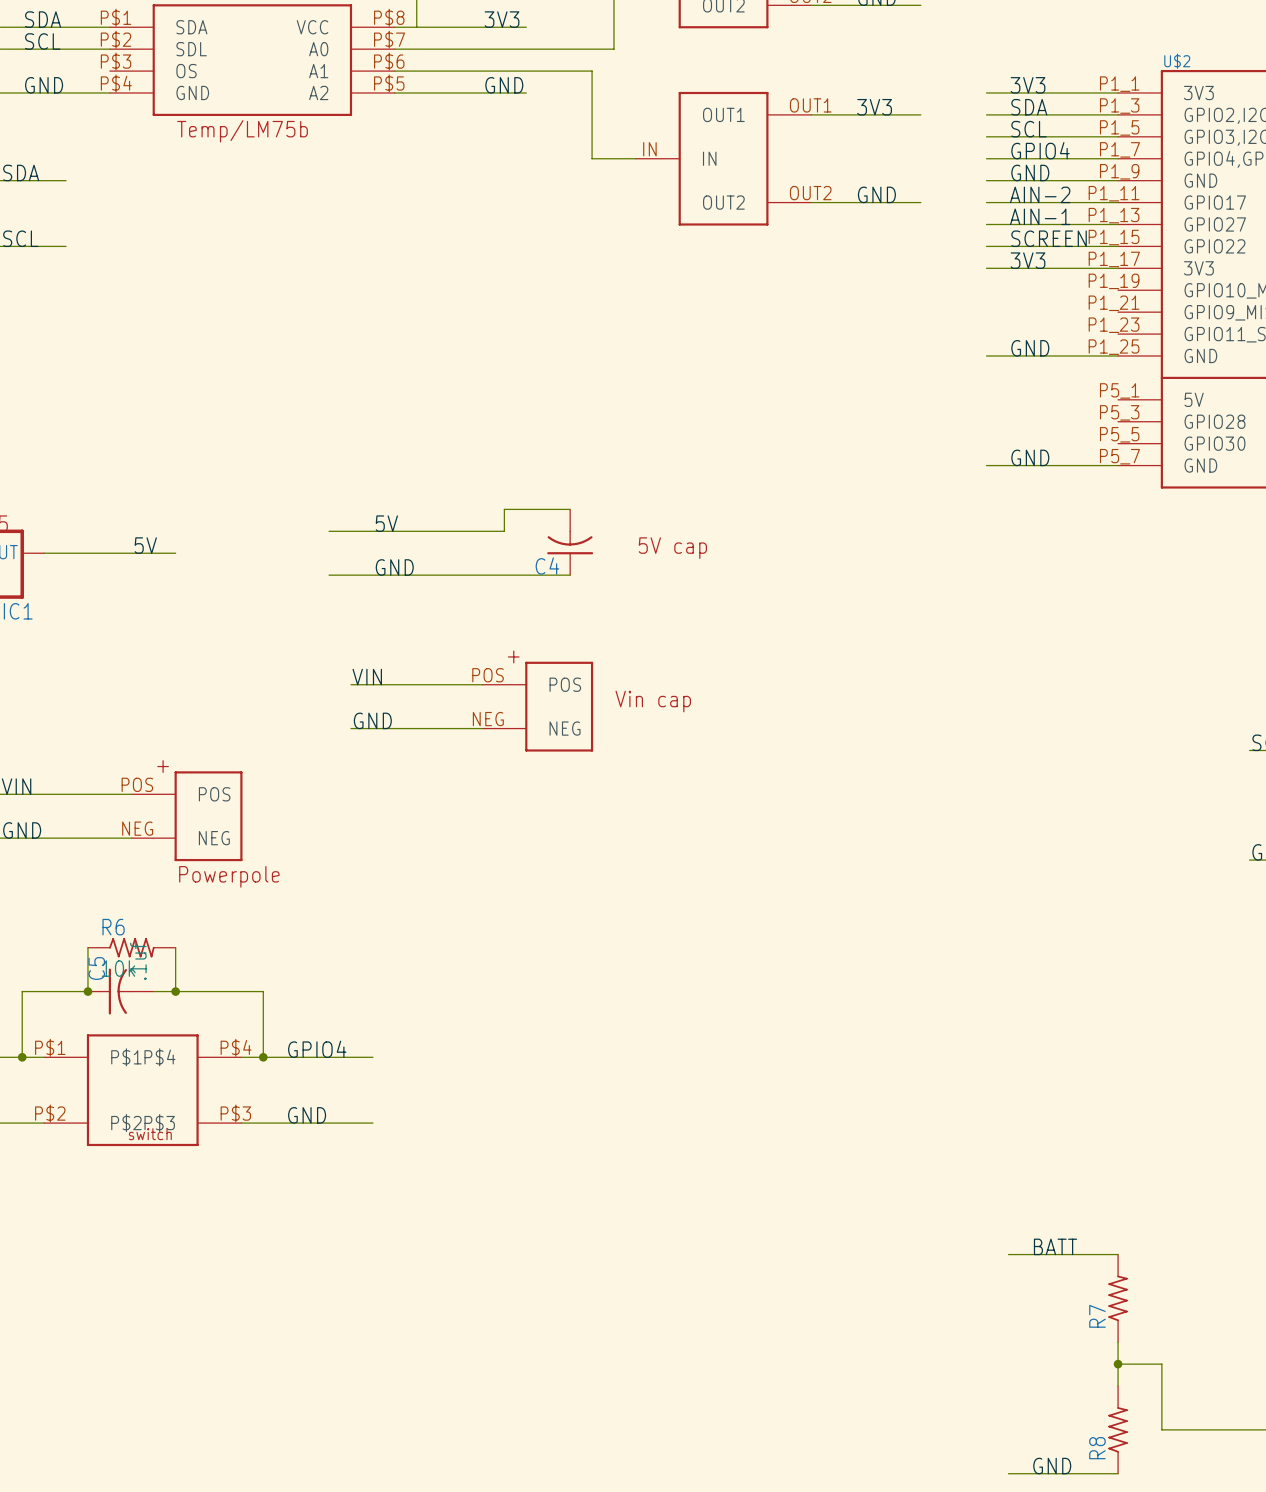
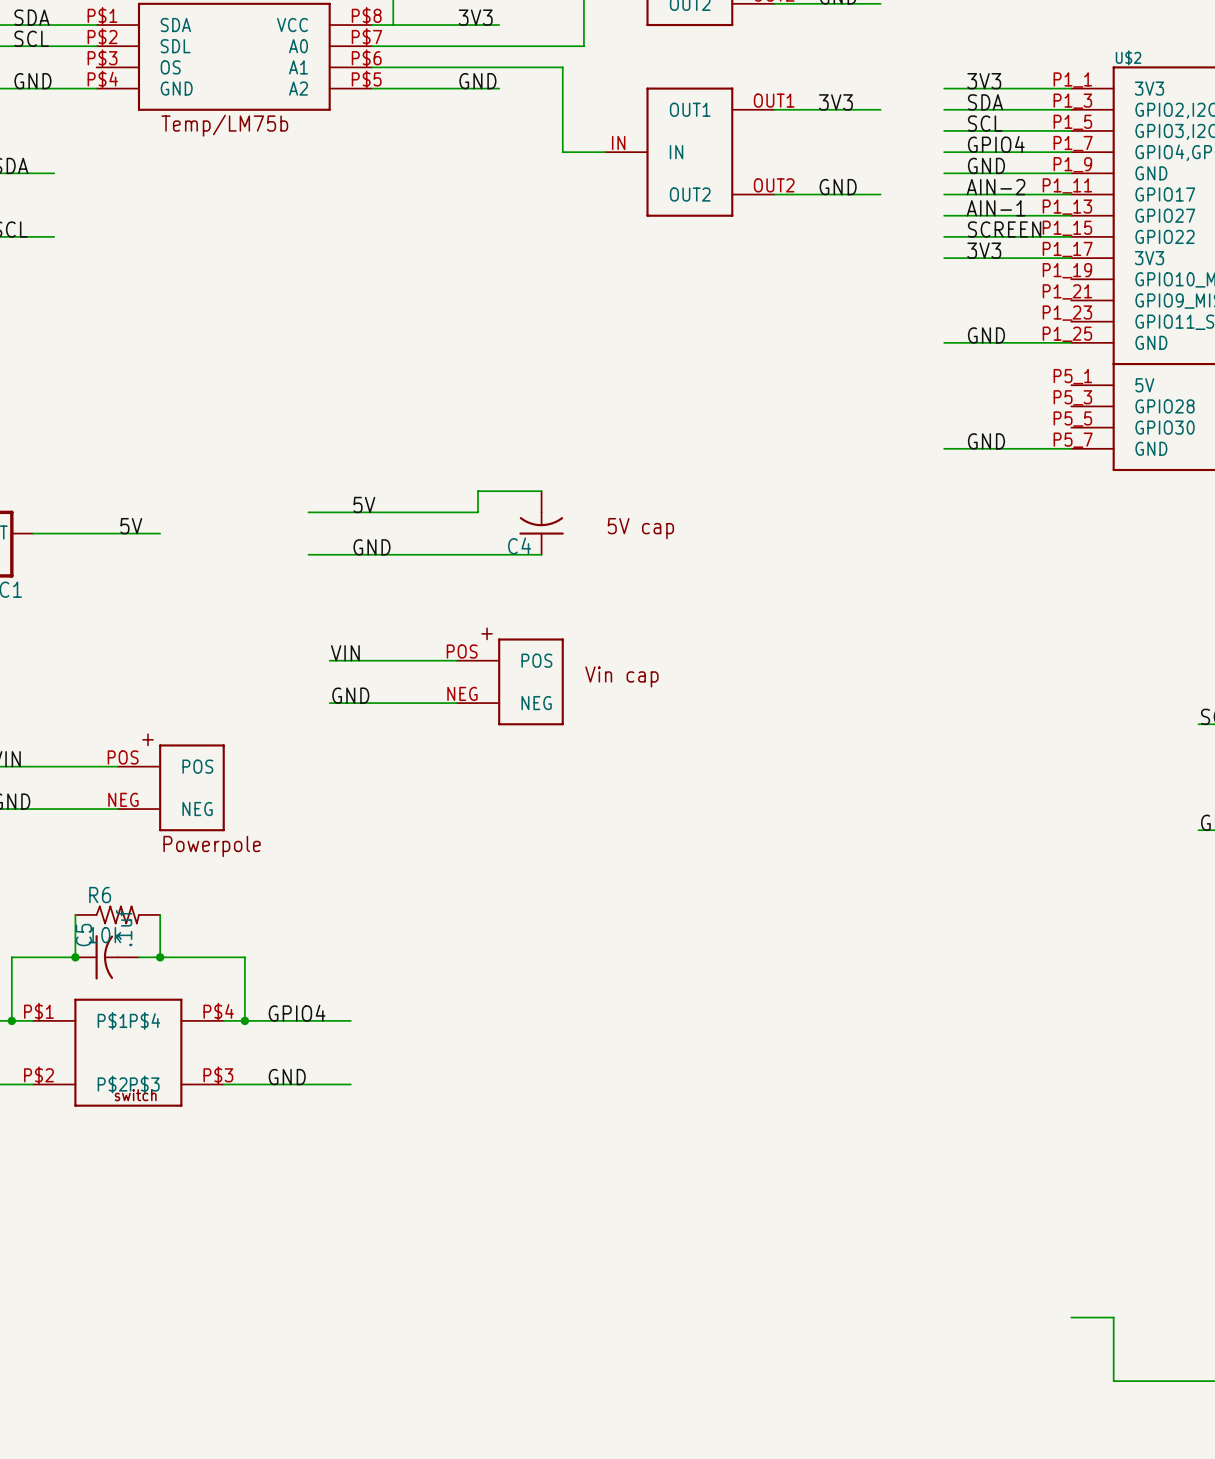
label: BATT (1055, 1246) -> none
wire: (1008, 1254) (1118, 1254) -> none
R7: (1118, 1298) -> none
wire: (1118, 1342) (1118, 1386) -> none
junction: (1118, 1364) -> none
R8: (1118, 1429) -> none
label: GND (1052, 1466) -> none
wire: (1008, 1473) (1118, 1473) -> none

